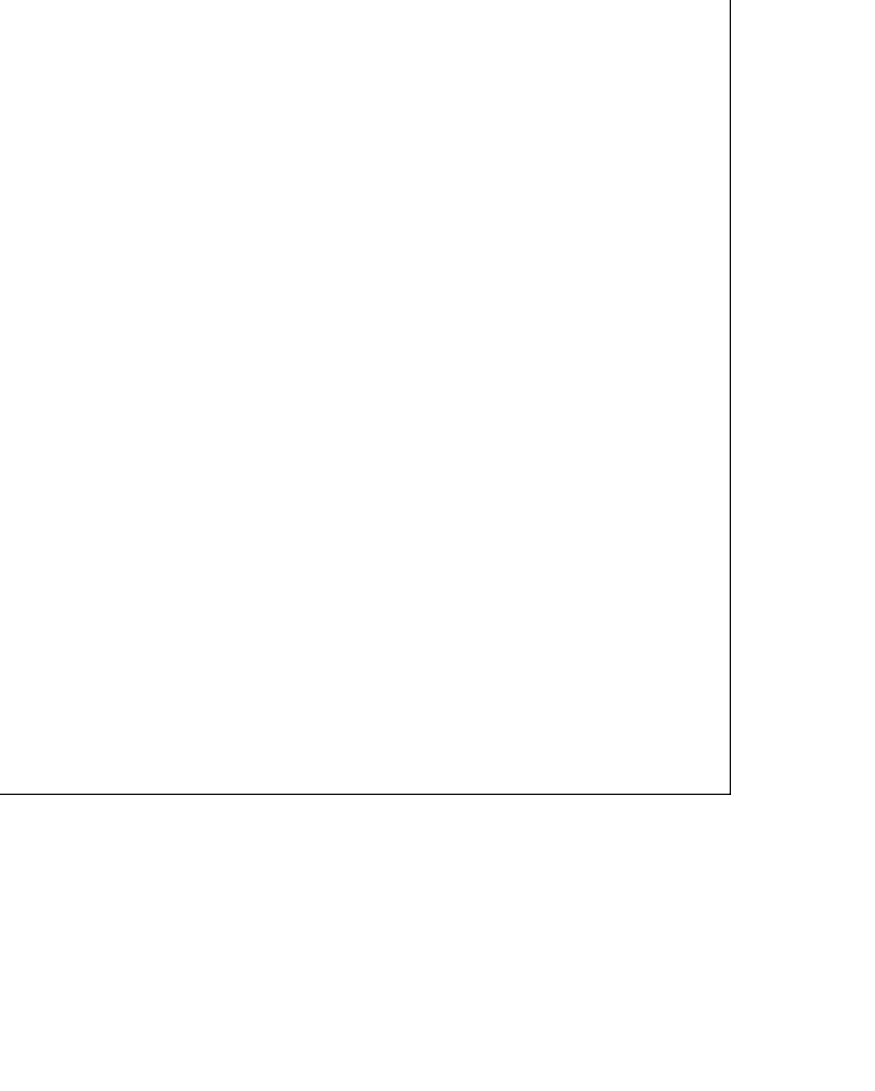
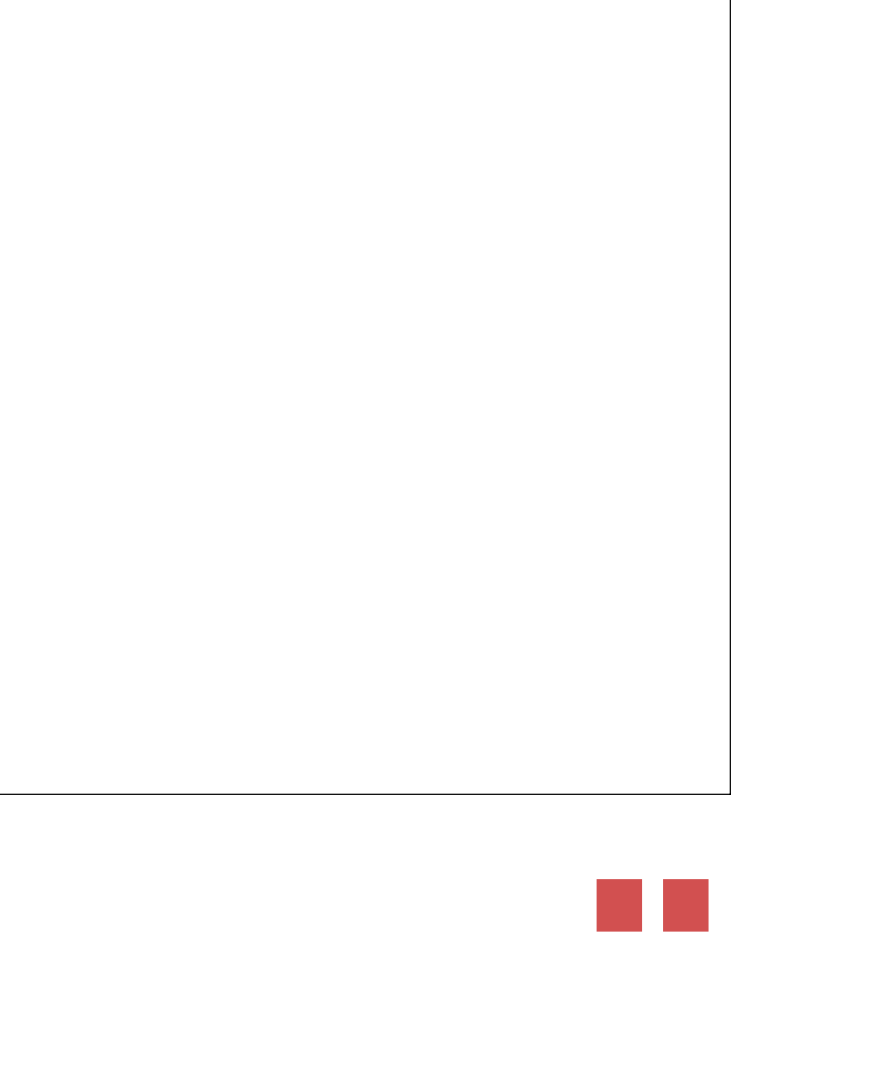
part: none -> (652, 905)

